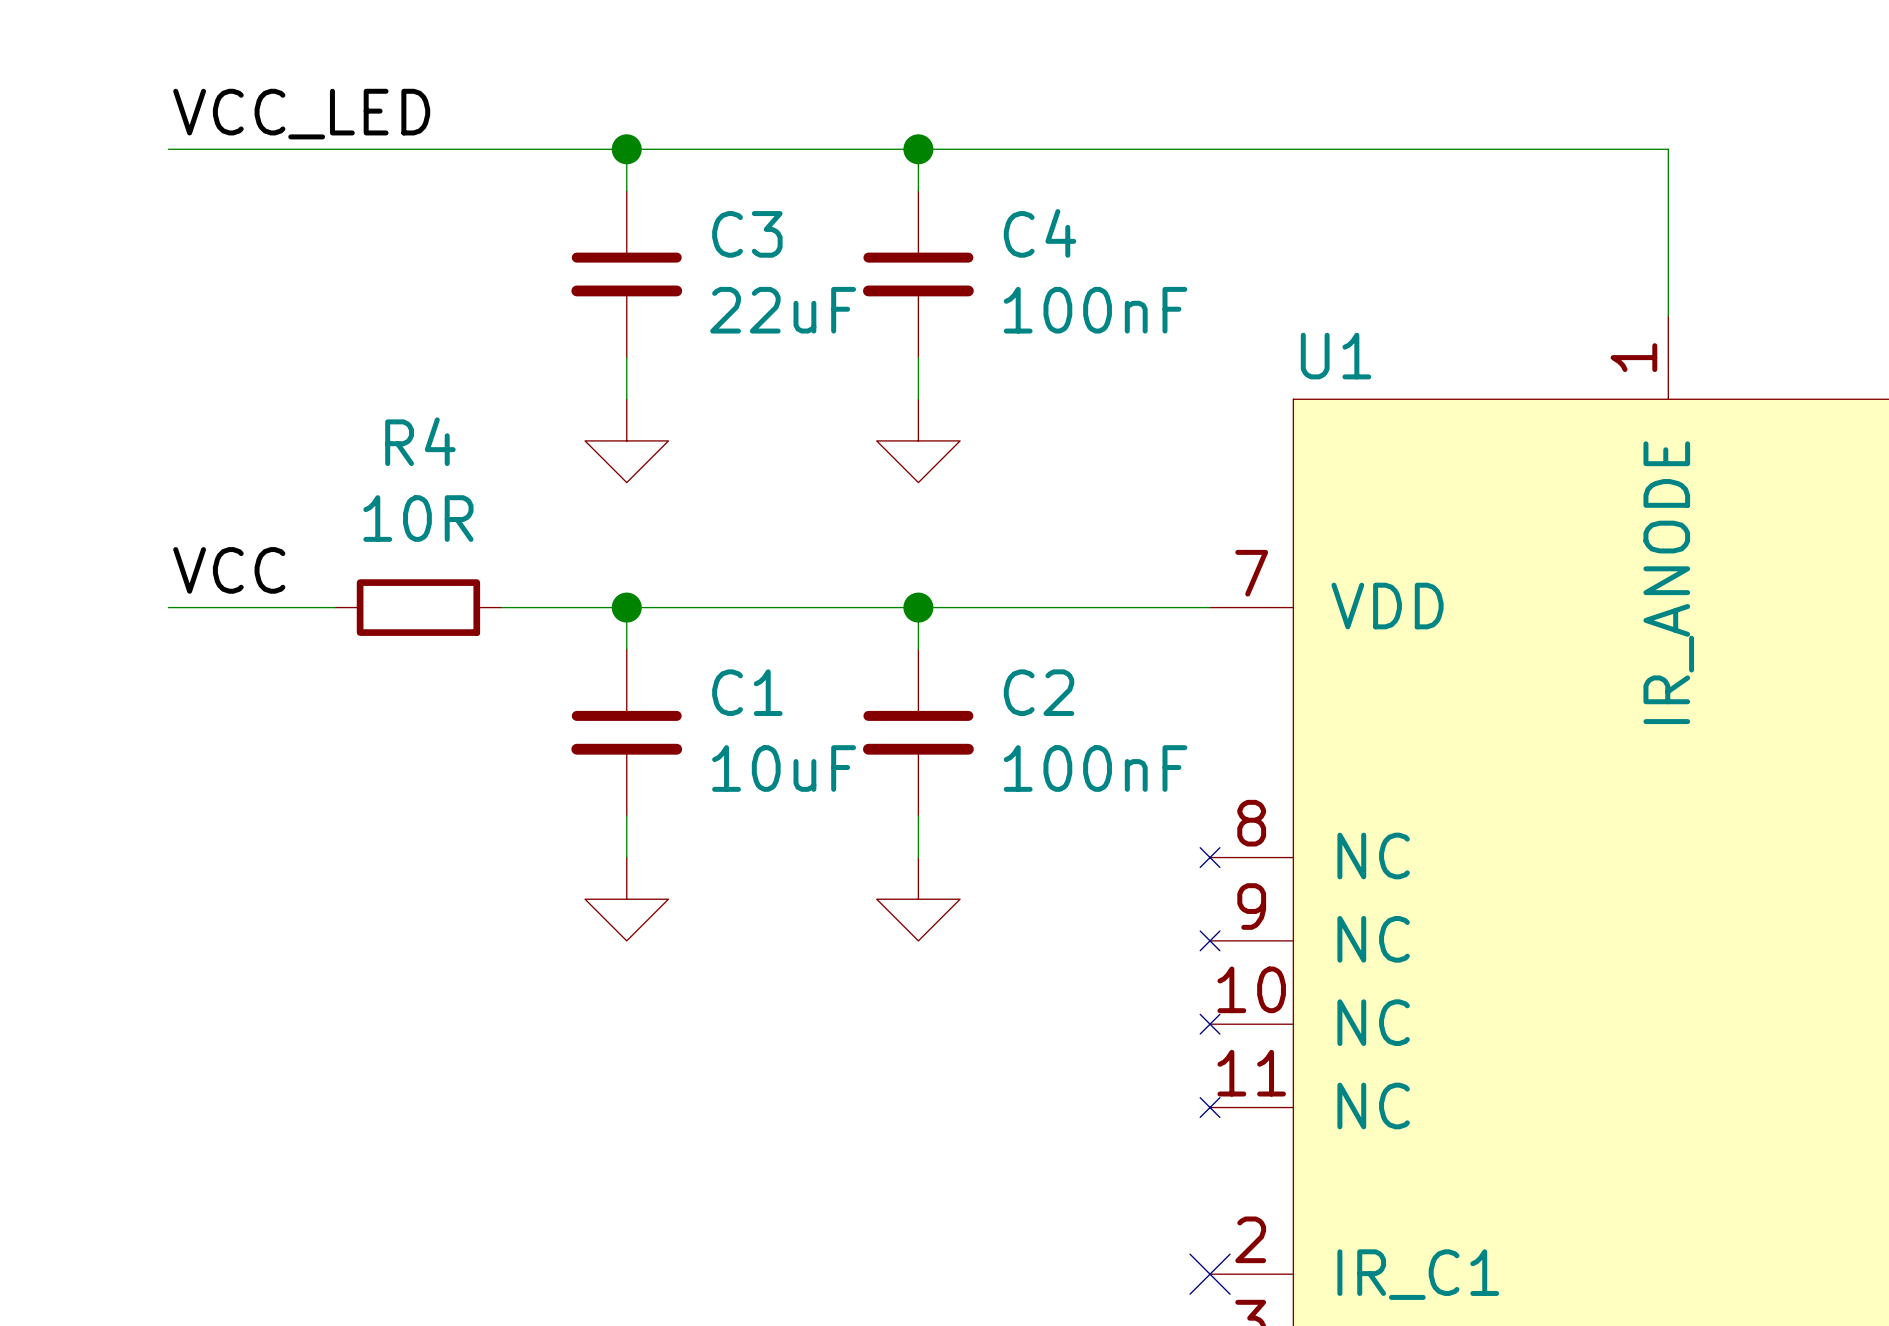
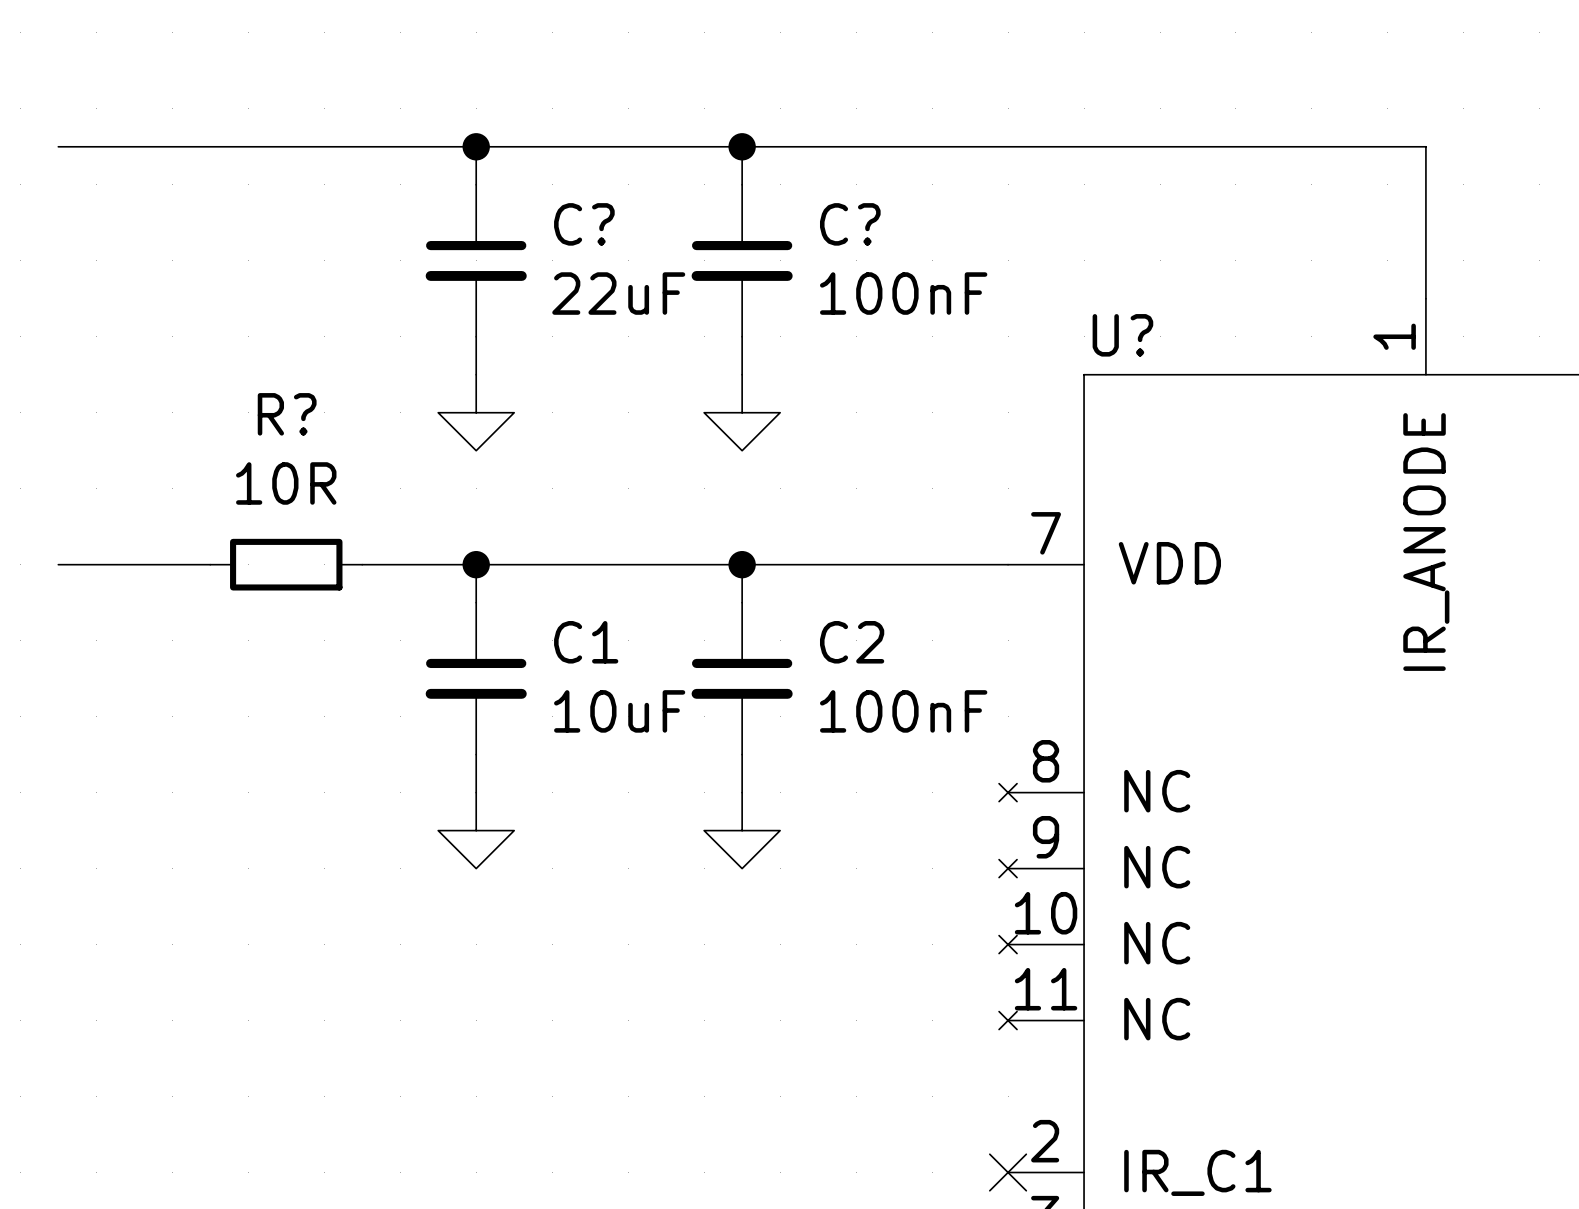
label: VCC_LED (301, 114) -> none
C4 name: C4 (1040, 233) -> C? (850, 224)
C3 name: C3 (747, 234) -> C? (584, 224)
U1 name: U1 (1336, 356) -> U? (1122, 335)
R4 name: R4 (420, 441) -> R? (287, 414)
label: VCC (229, 570) -> none

